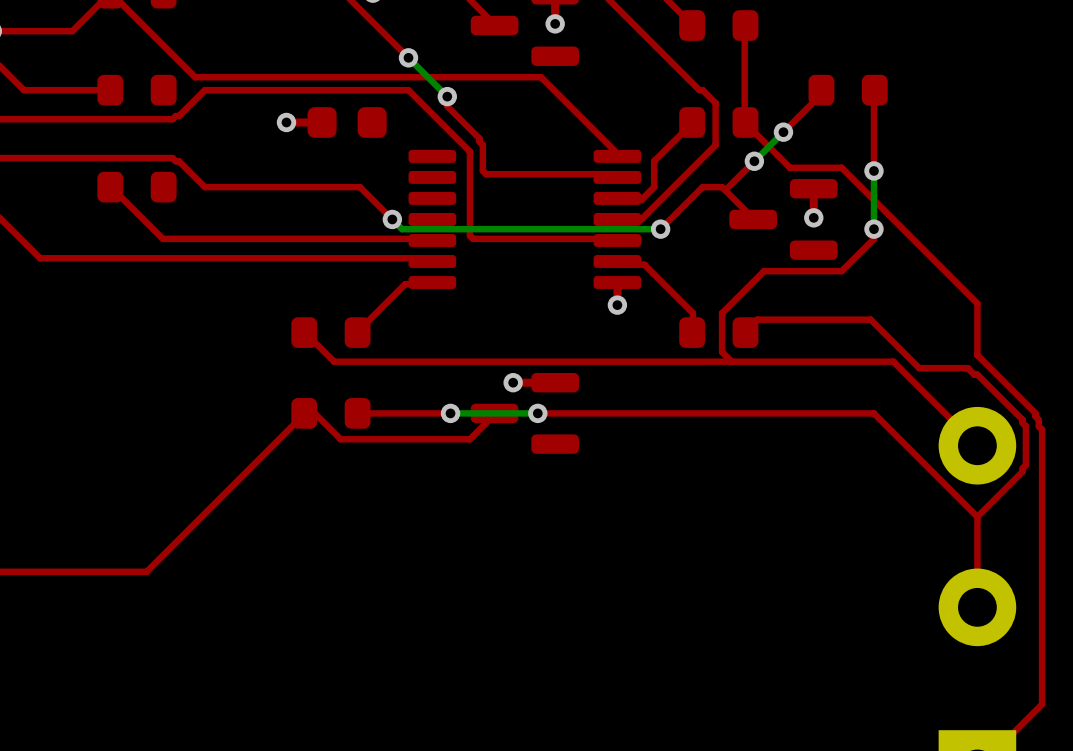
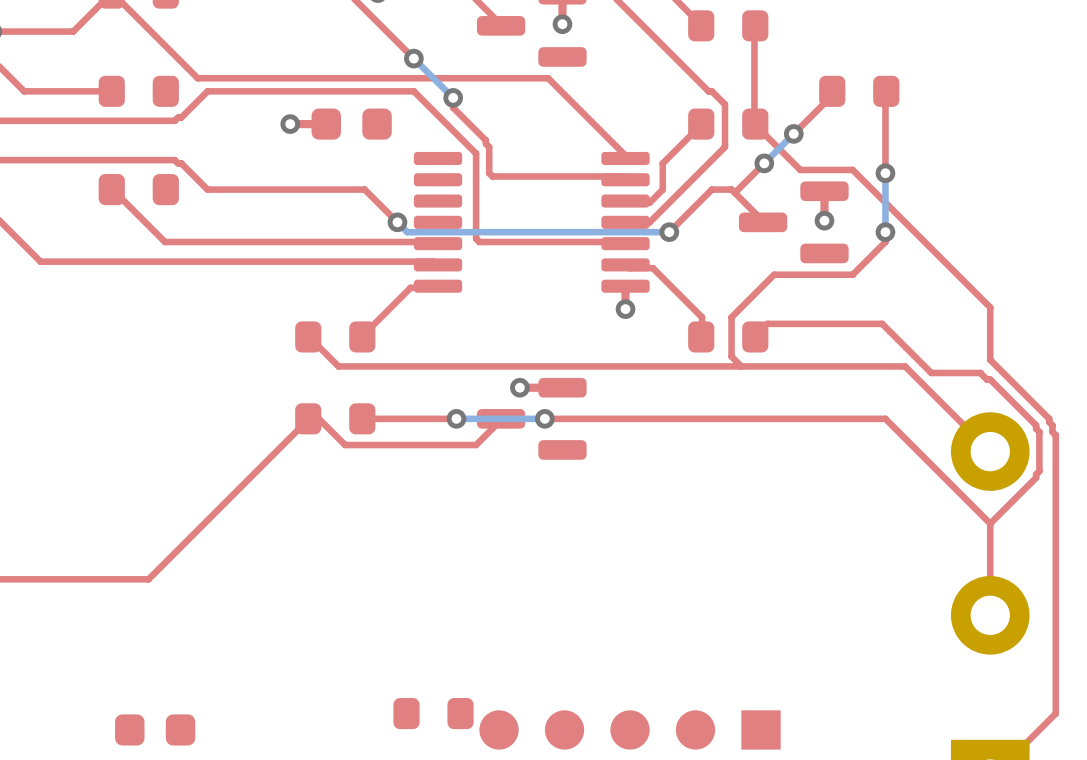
part: none -> (433, 713)
part: none -> (155, 729)
part: none -> (630, 729)

